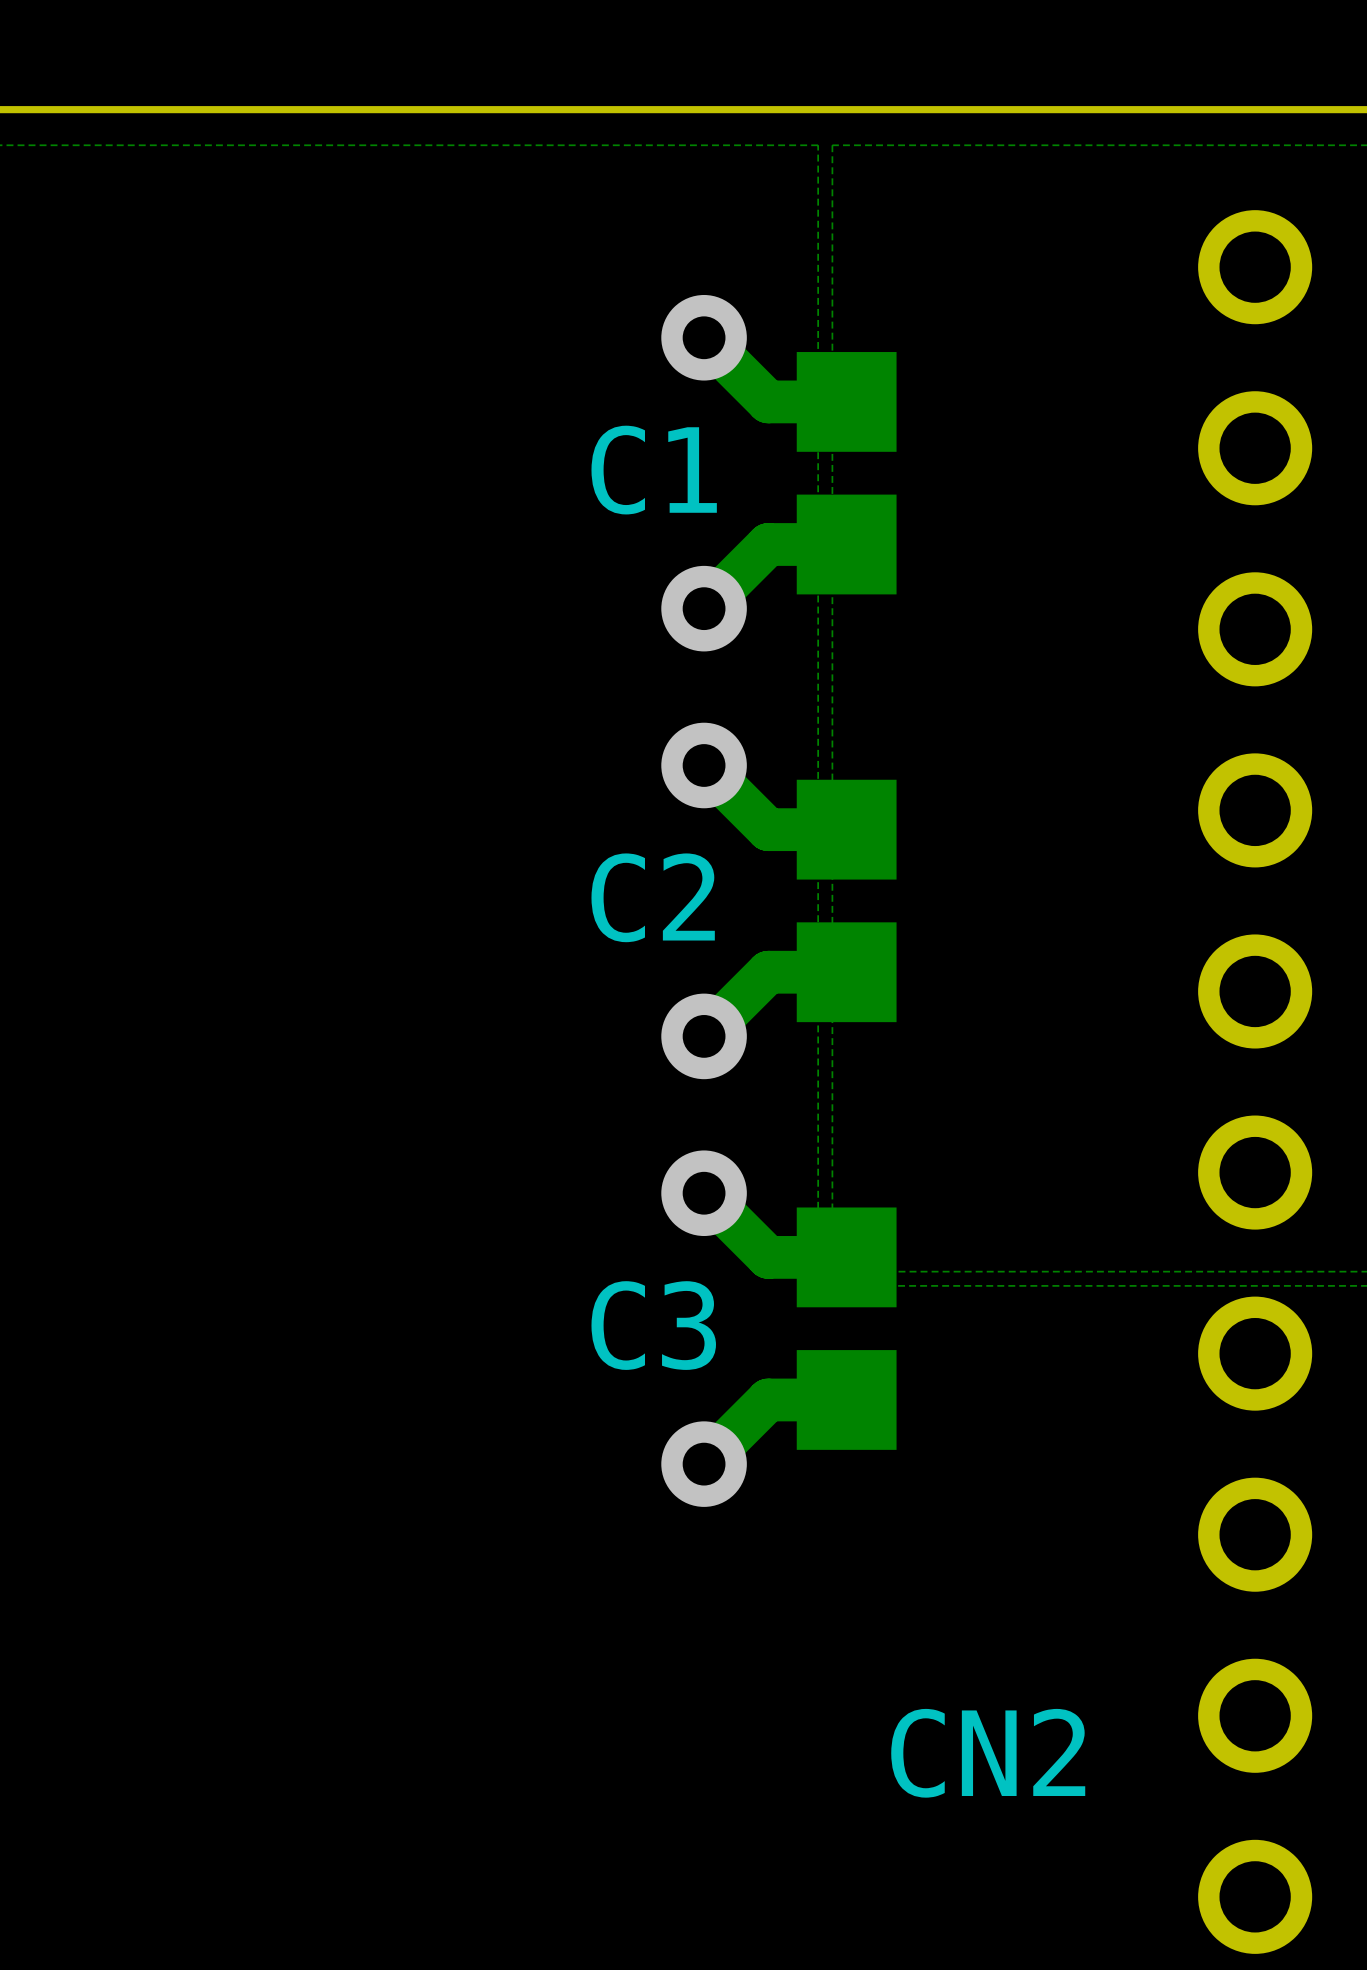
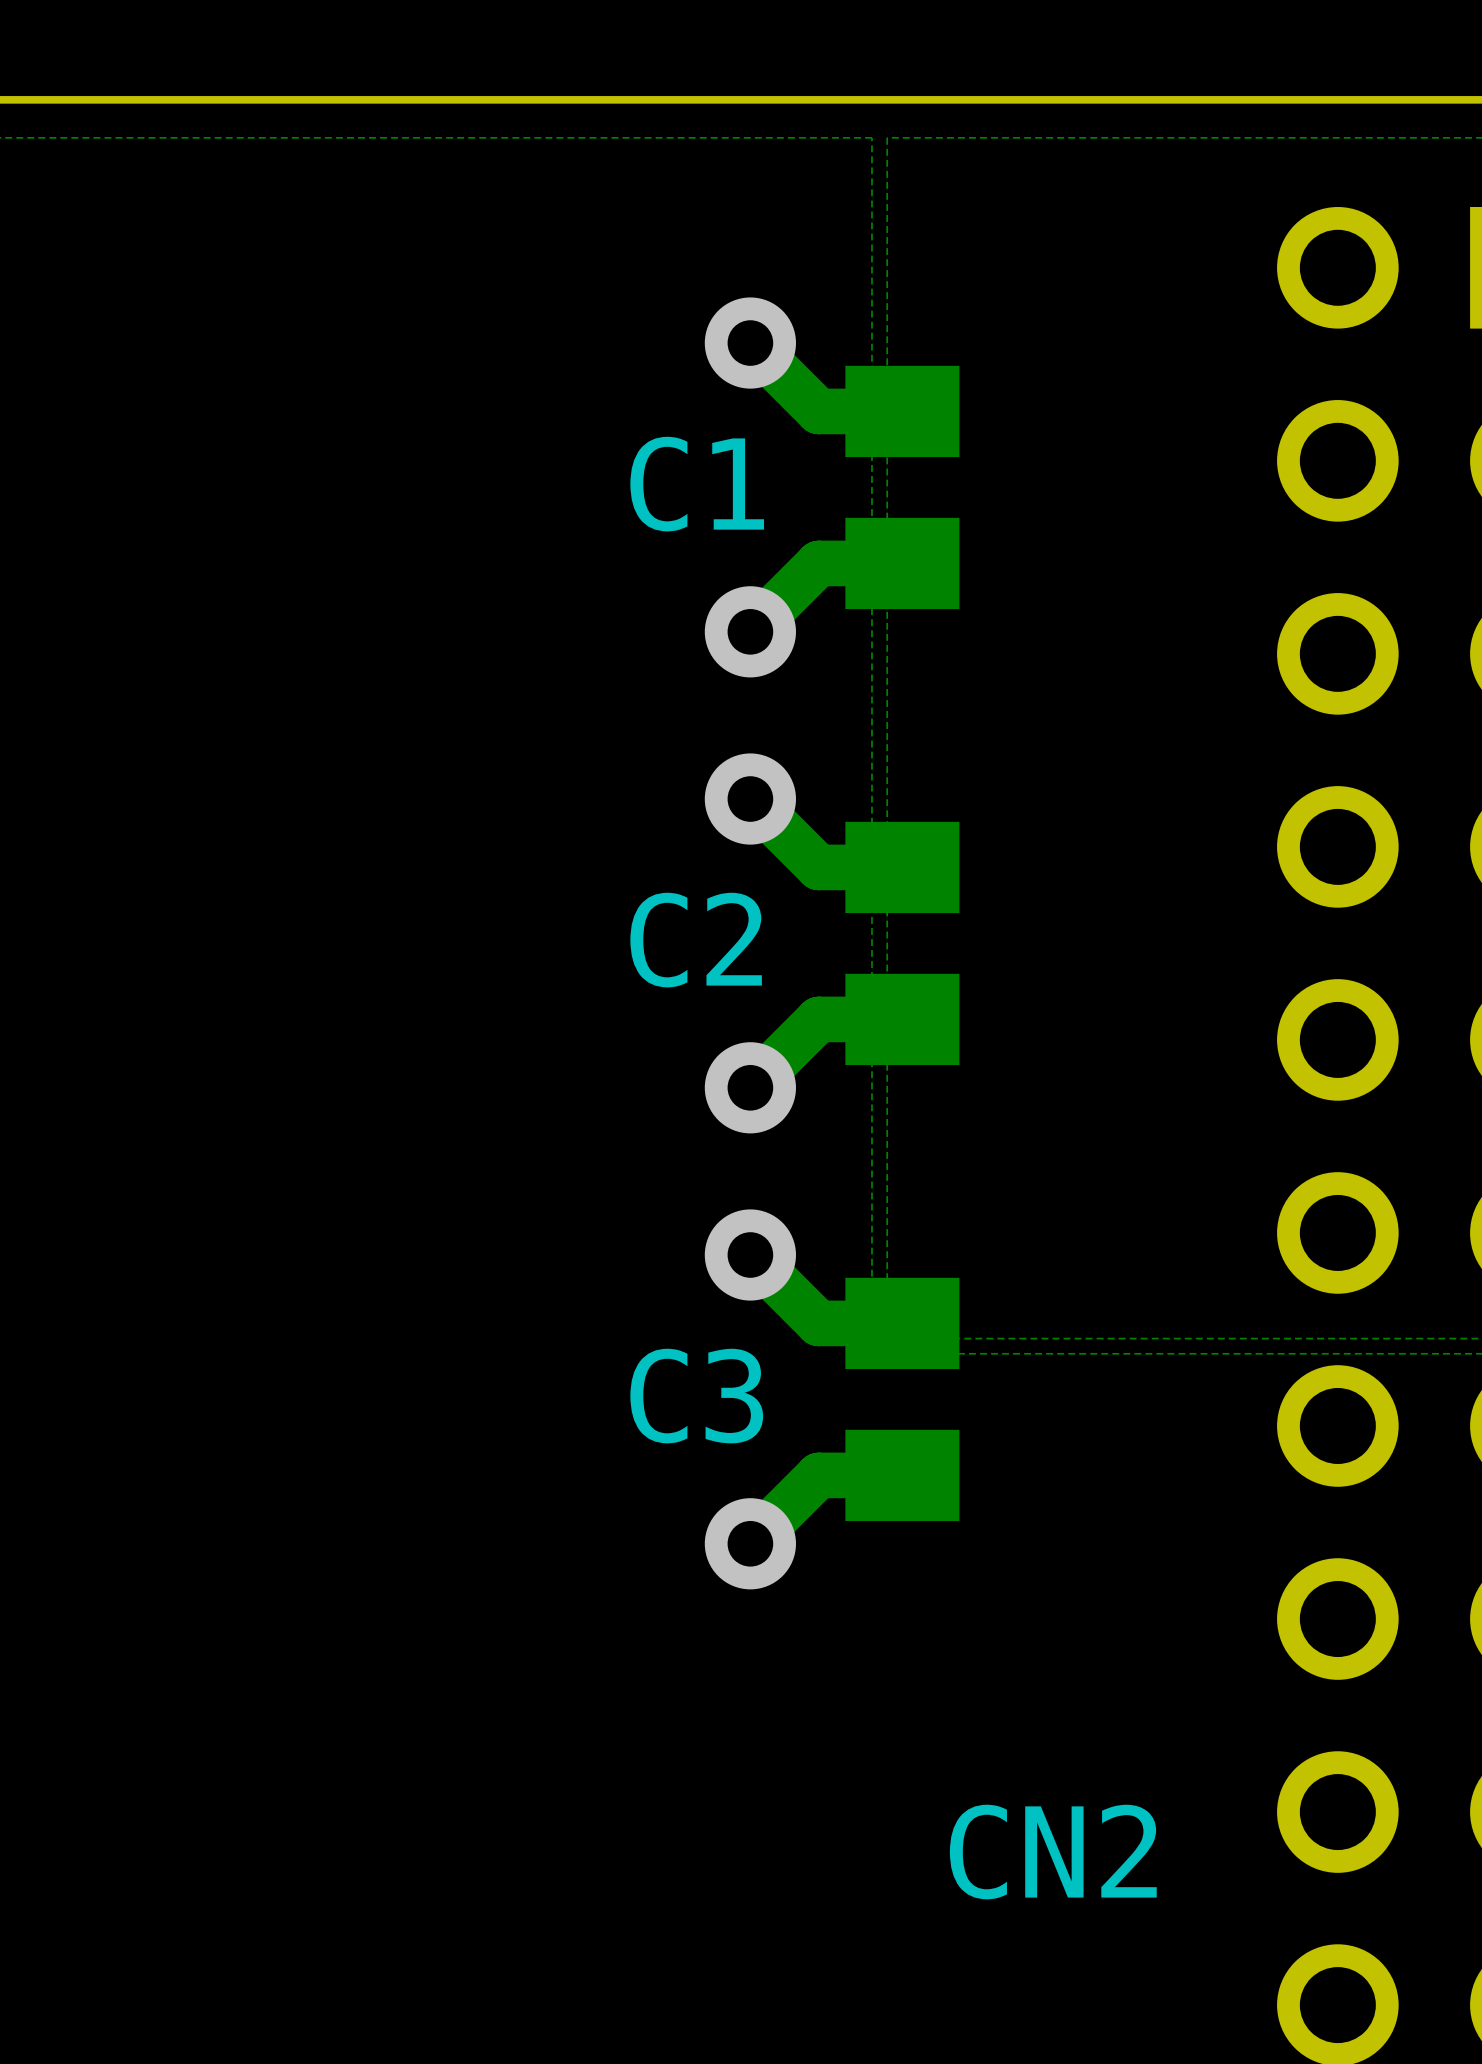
C1 footprint: [796, 352, 897, 595] -> [845, 365, 960, 610]
C2 footprint: [796, 779, 897, 1023] -> [845, 821, 960, 1066]
C3 footprint: [796, 1207, 897, 1450] -> [845, 1277, 960, 1521]

